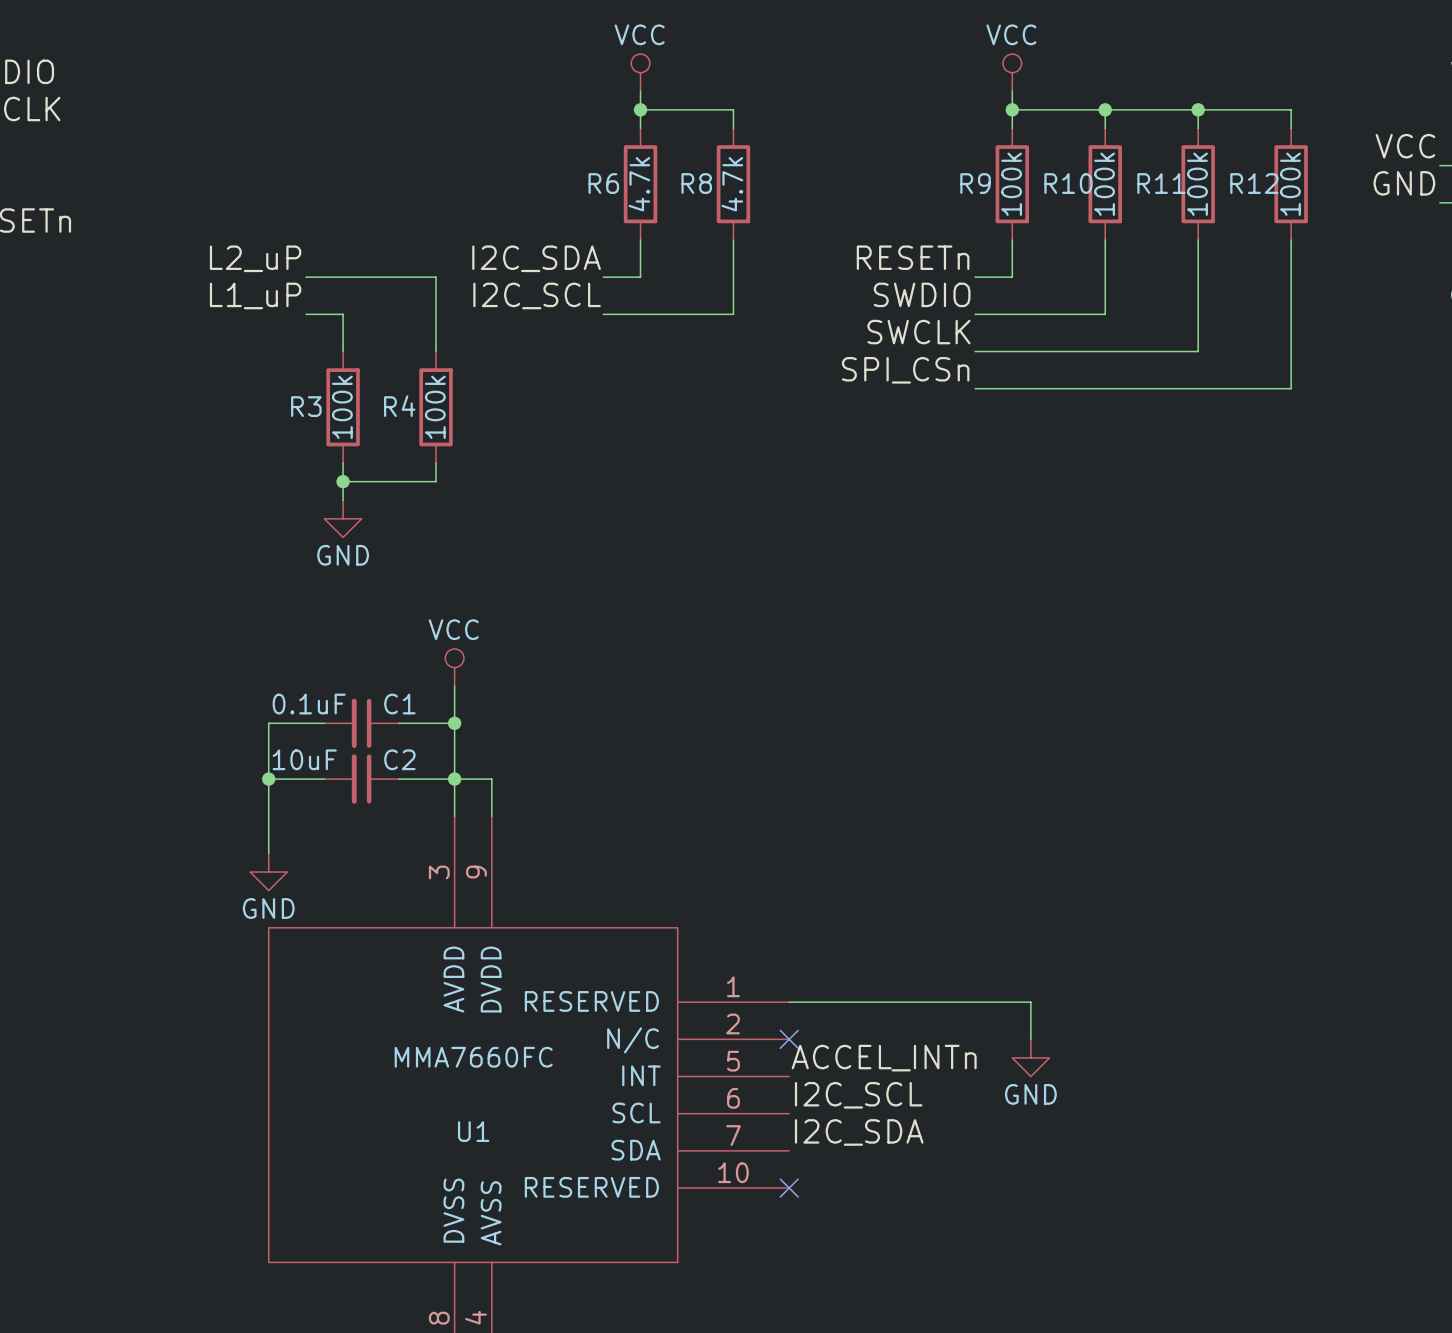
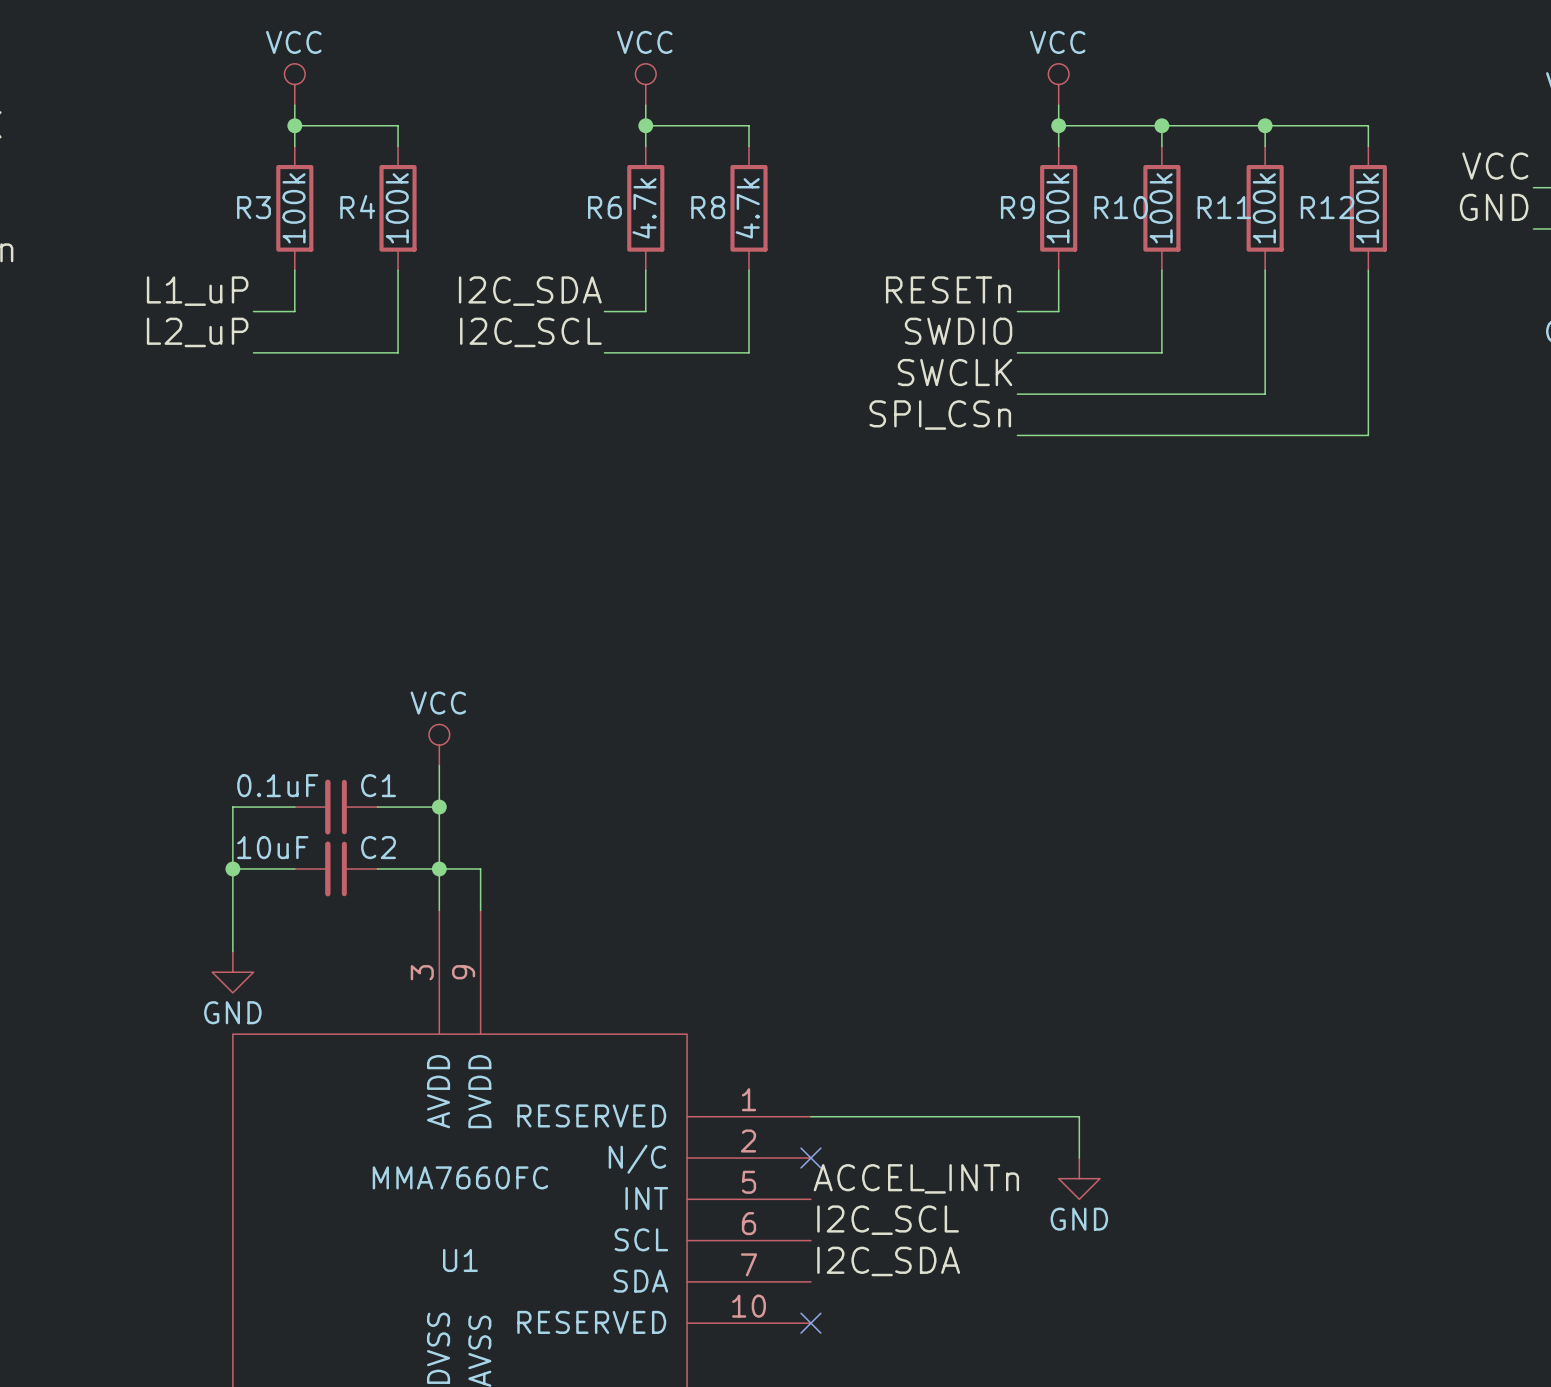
power symbol: none -> VCC (294, 84)
wire: none -> (294, 105) (294, 146)
wire: none -> (294, 125) (398, 125) (398, 146)
junction: none -> (294, 125)
label position: L2_uP (255, 258) -> L2_uP (197, 332)
wire: none -> (253, 311) (274, 311)
wire: (324, 277) (436, 277) (436, 351) -> (294, 311) (294, 270)
label position: L1_uP (255, 295) -> L1_uP (197, 291)
wire: none -> (253, 352) (274, 352)
wire: (343, 314) (343, 351) -> (315, 352) (398, 352) (398, 270)
R3 position: (343, 407) -> (294, 208)
R4 position: (436, 407) -> (398, 208)
wire: (343, 463) (343, 500) -> none
wire: (436, 463) (436, 481) (343, 481) -> none
junction: (343, 481) -> none
power symbol: GND (343, 518) -> none

